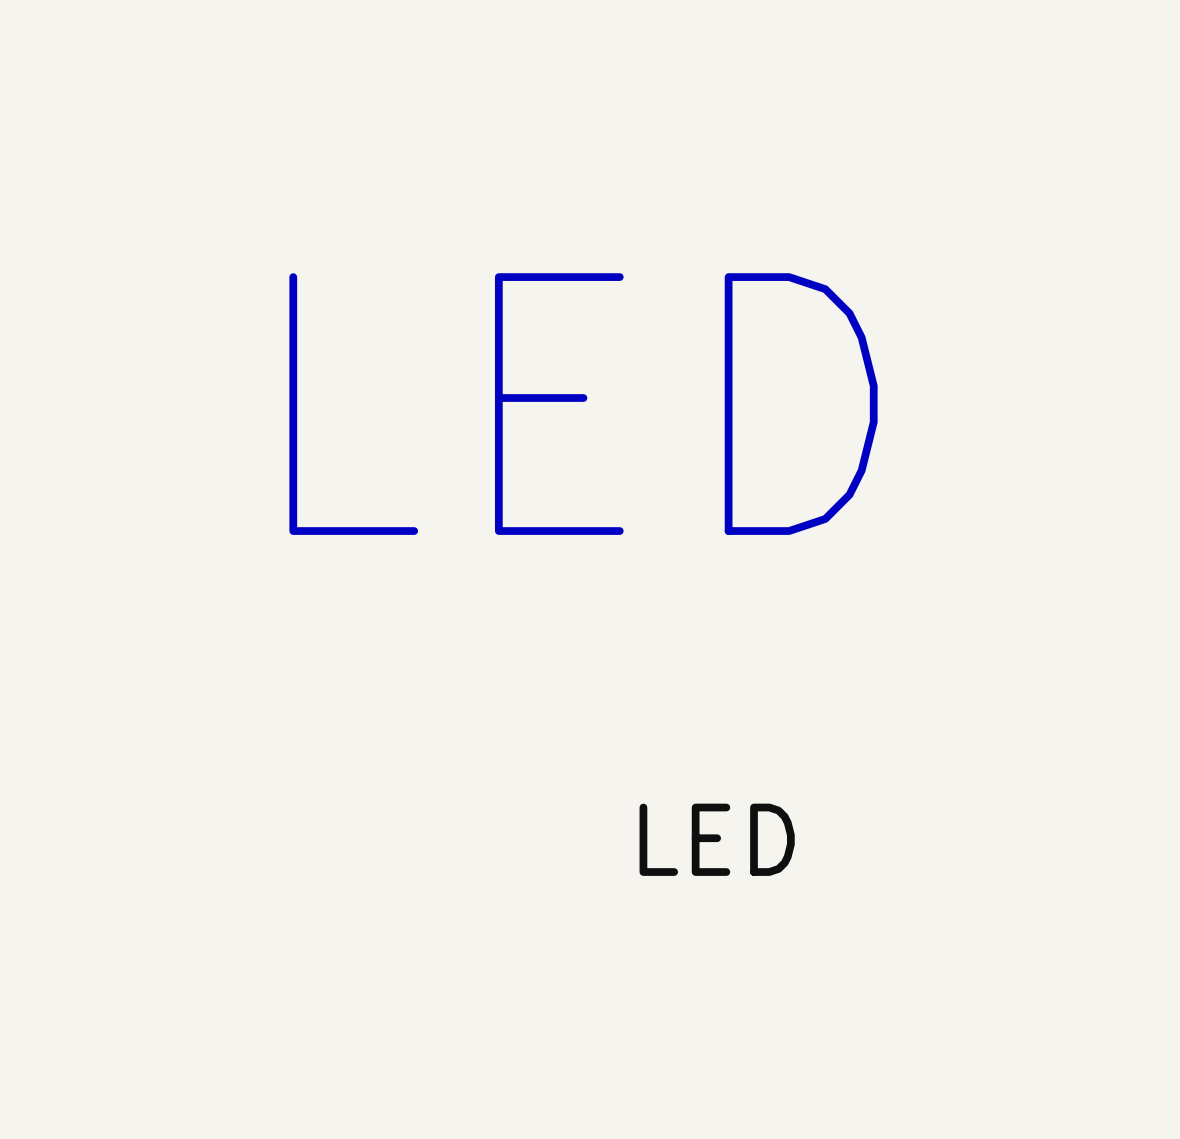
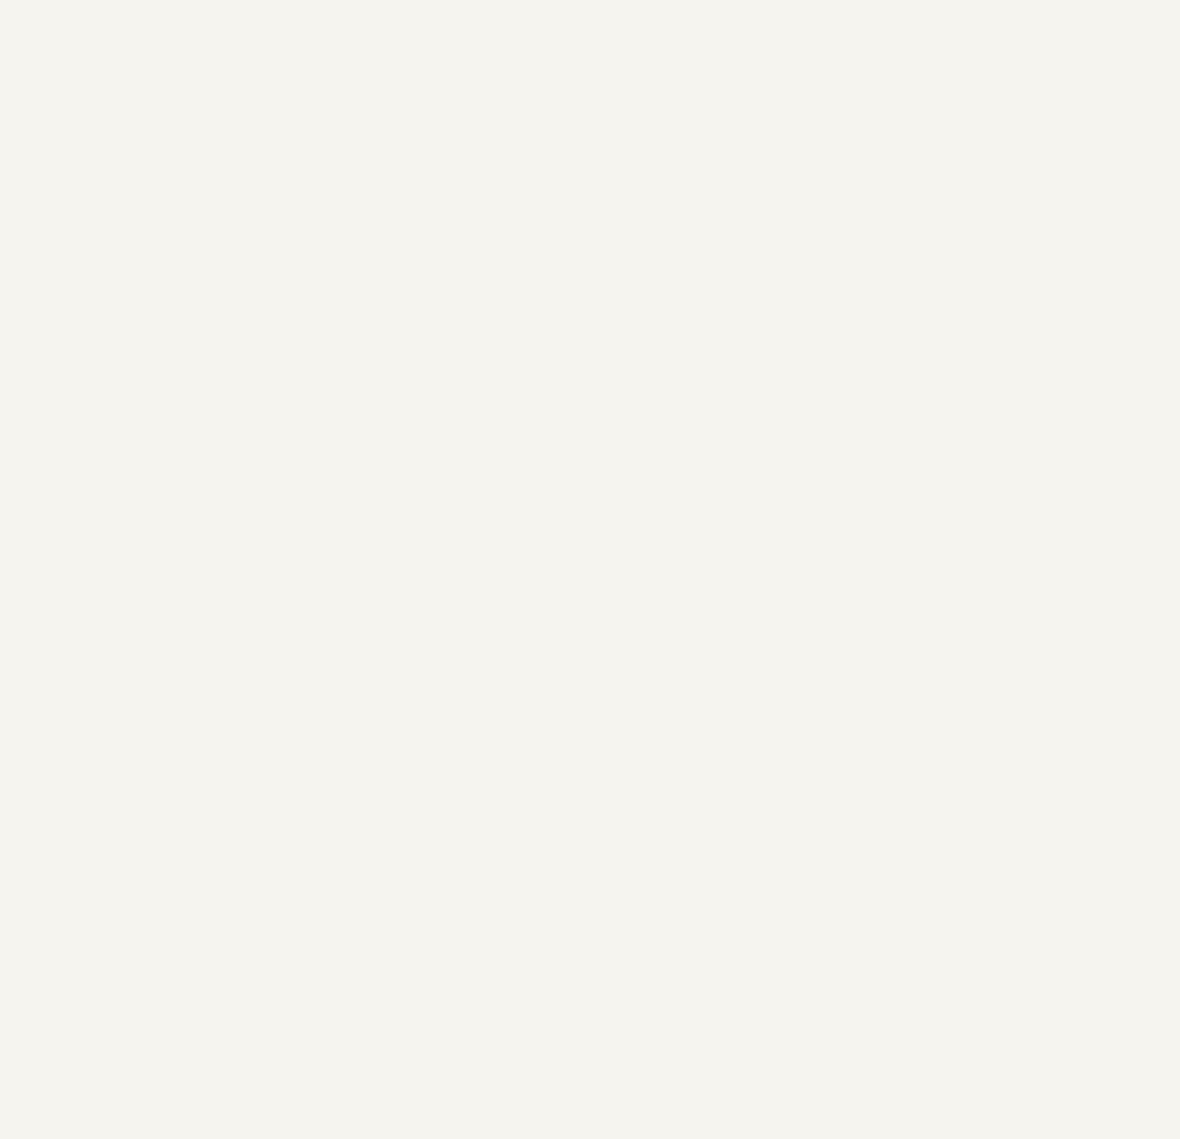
text: LED (583, 404) -> none
label: LED (717, 839) -> none

